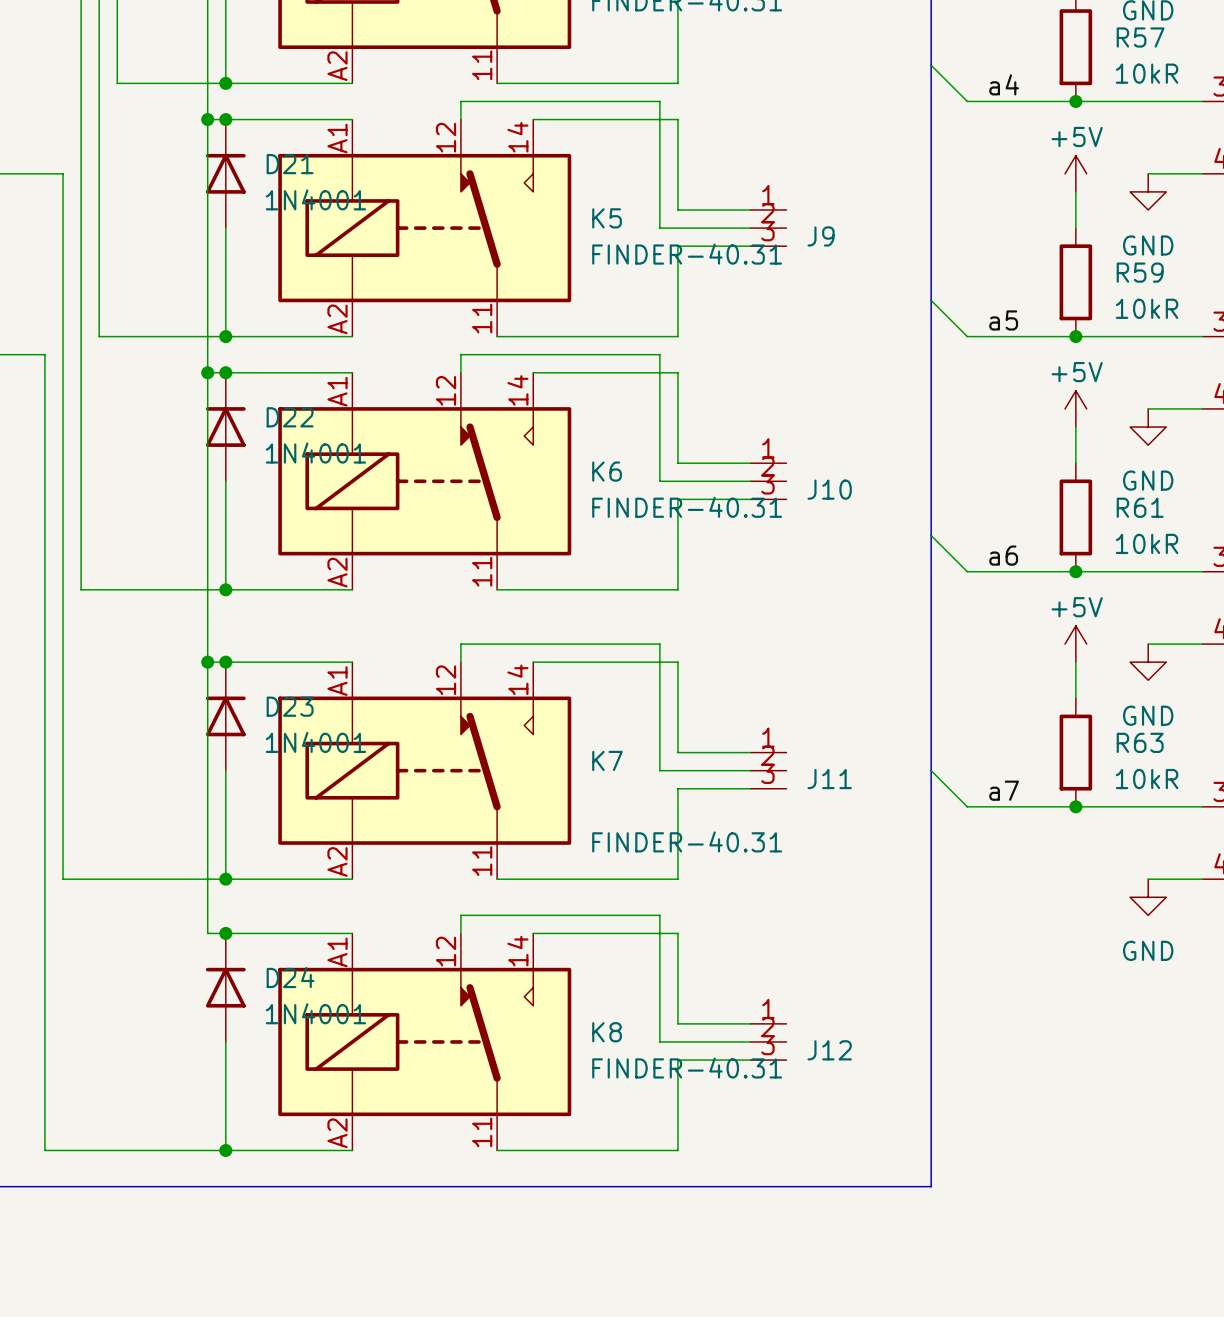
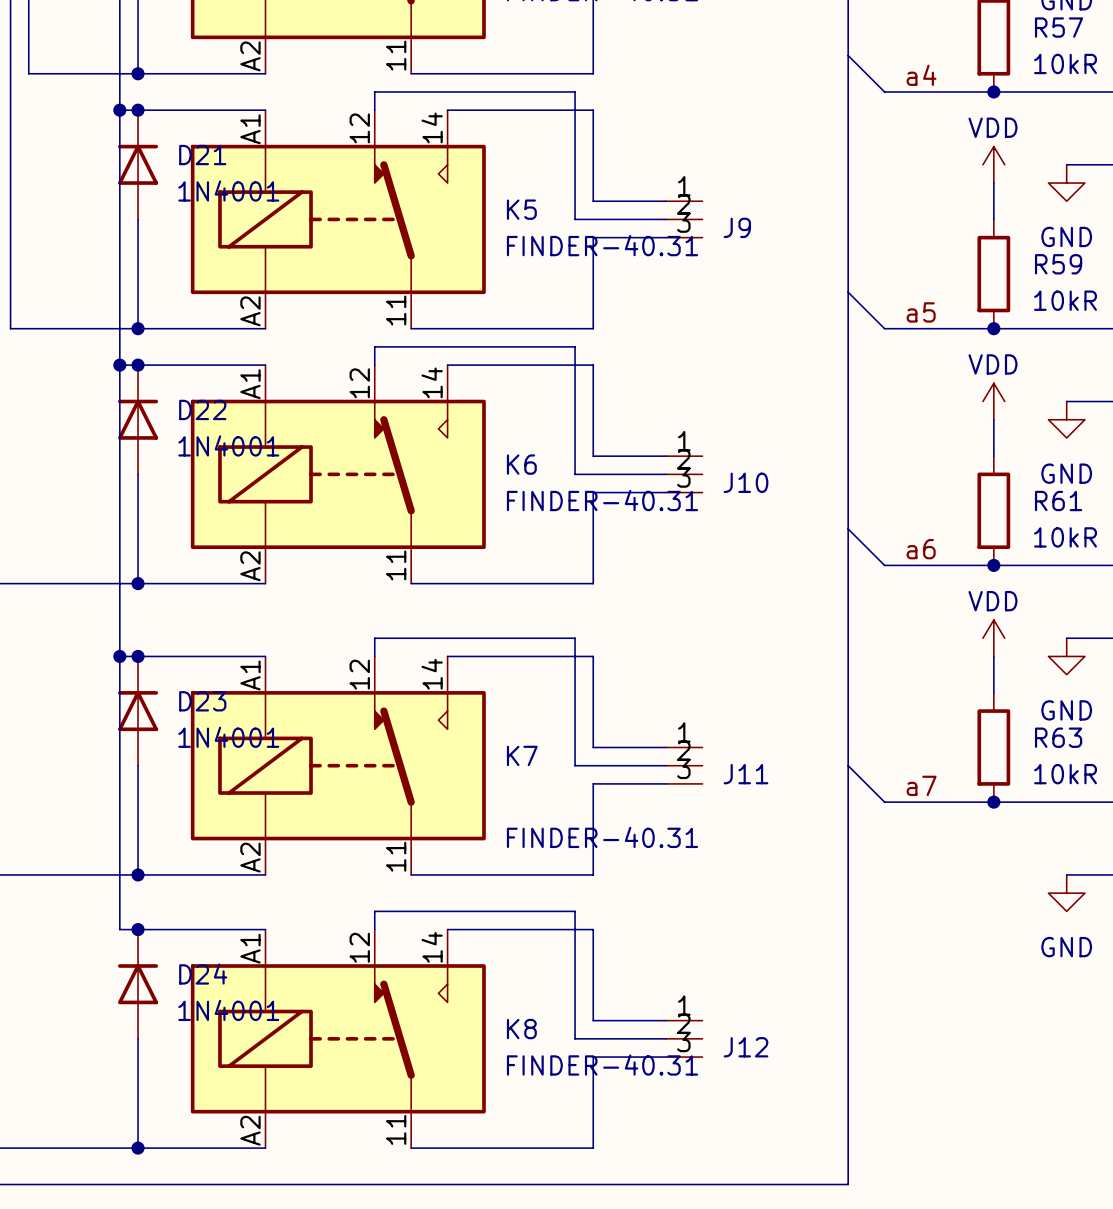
power symbol: +5V (1075, 173) -> VDD (993, 164)
power symbol: +5V (1075, 408) -> VDD (993, 401)
power symbol: +5V (1075, 644) -> VDD (993, 638)

